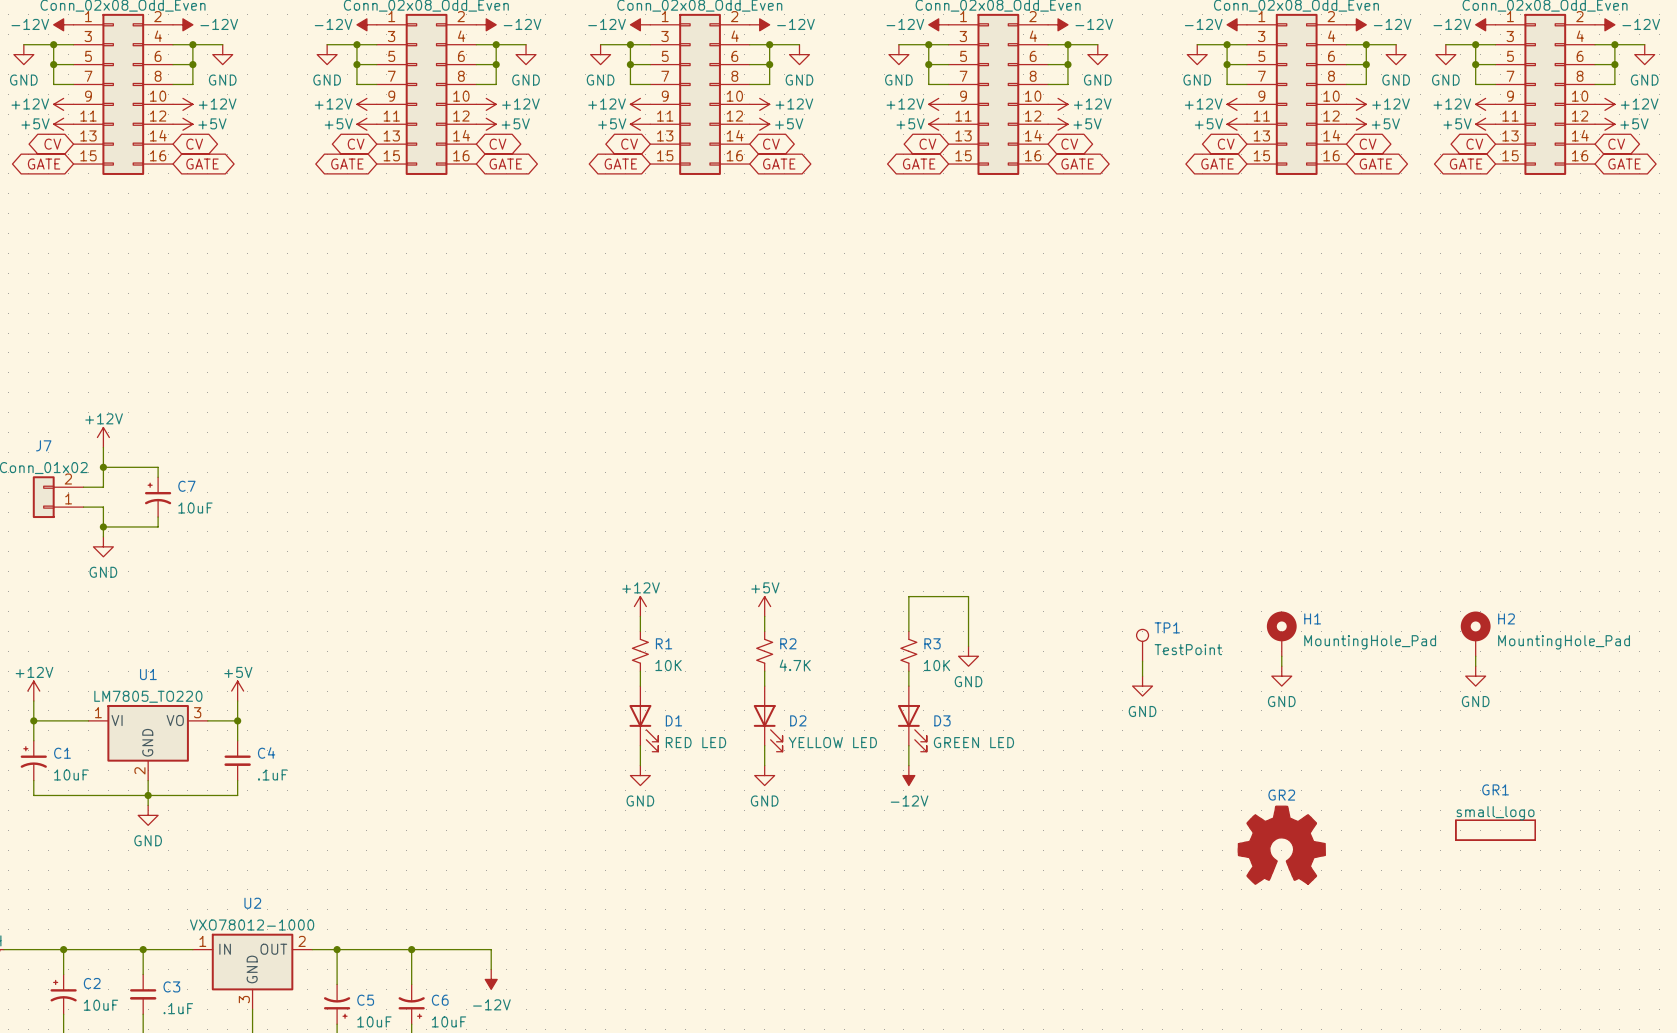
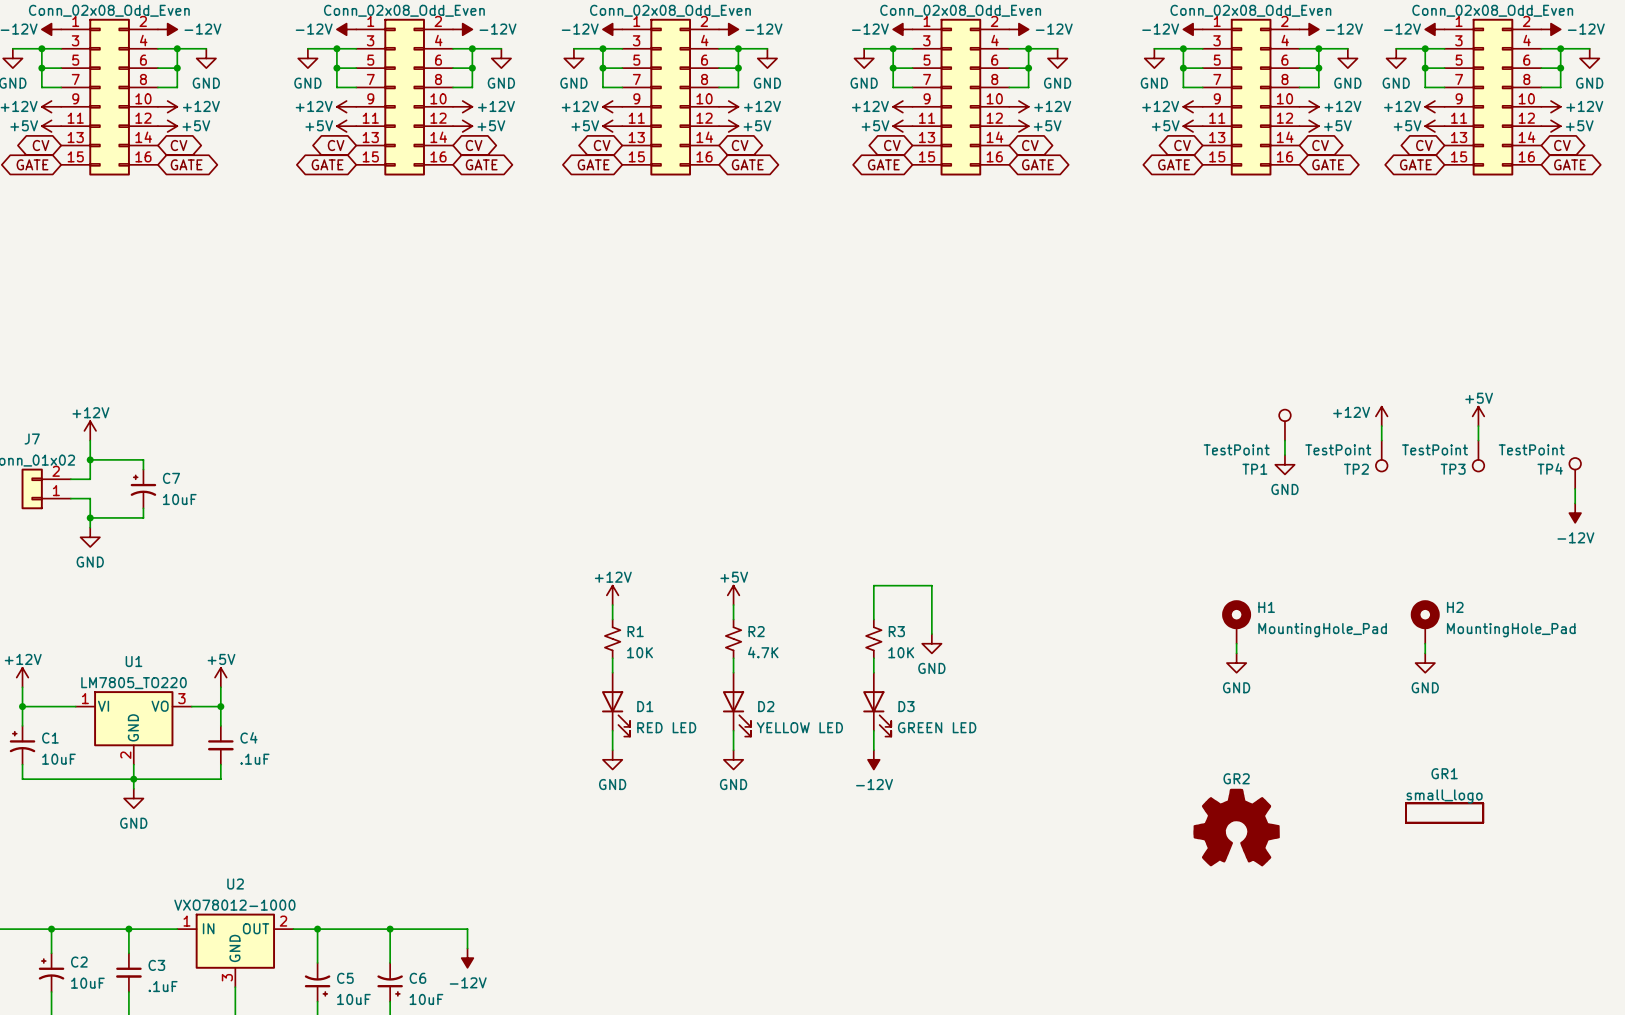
power symbol: none -> +12V (1381, 416)
power symbol: none -> +5V (1478, 416)
wire: none -> (1381, 426) (1381, 440)
wire: none -> (1478, 426) (1478, 440)
wire: none -> (1284, 440) (1284, 455)
TP2: none -> TestPoint (1381, 456)
TP3: none -> TestPoint (1478, 456)
power symbol: none -> GND (1284, 464)
TP4: none -> TestPoint (1575, 473)
wire: none -> (1575, 488) (1575, 503)
power symbol: none -> -12V (1575, 513)
TP1 name position: TP1 (1167, 627) -> TP1 (1254, 469)
TP1 position: (1142, 645) -> (1284, 425)
TP1 value position: TestPoint (1188, 649) -> TestPoint (1236, 449)
wire: (1142, 661) (1142, 676) -> none
power symbol: GND (1142, 686) -> none

